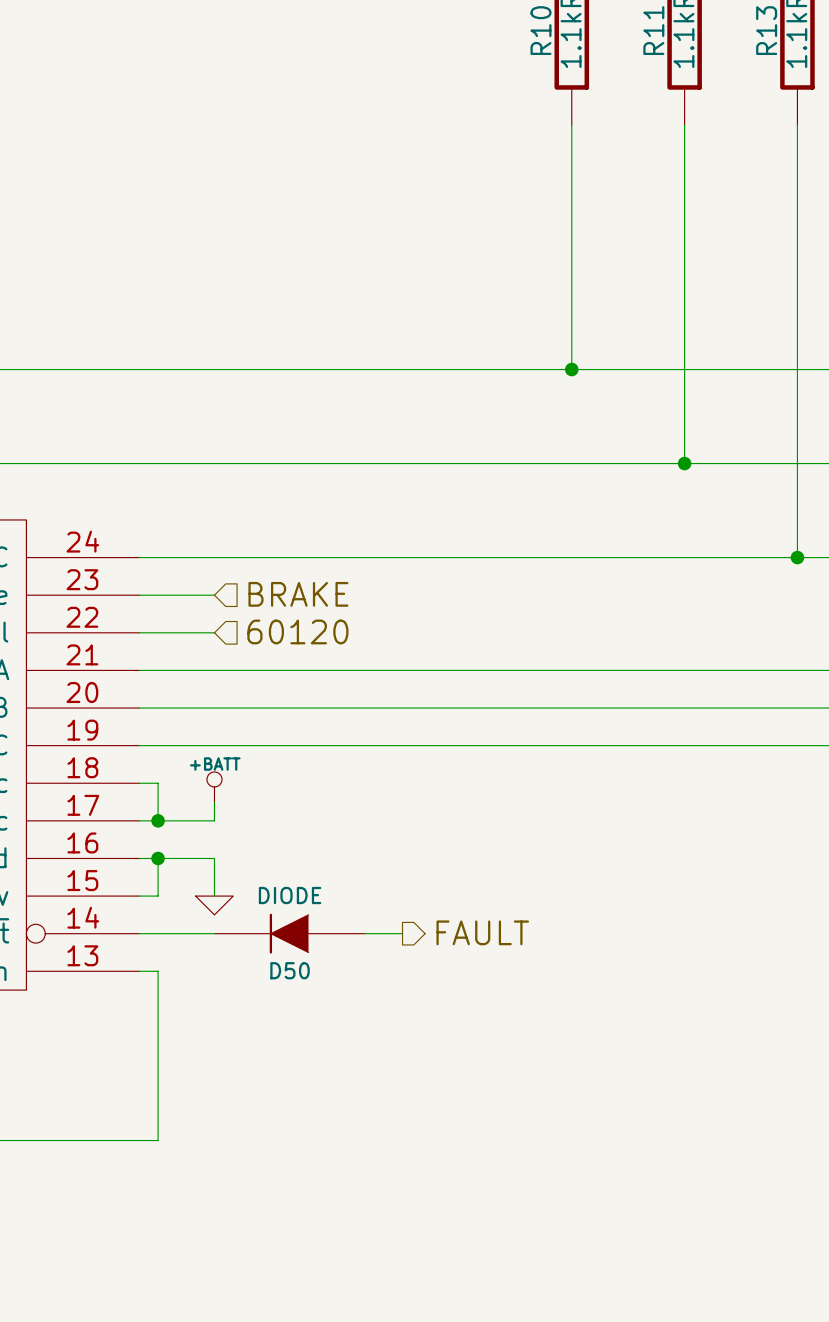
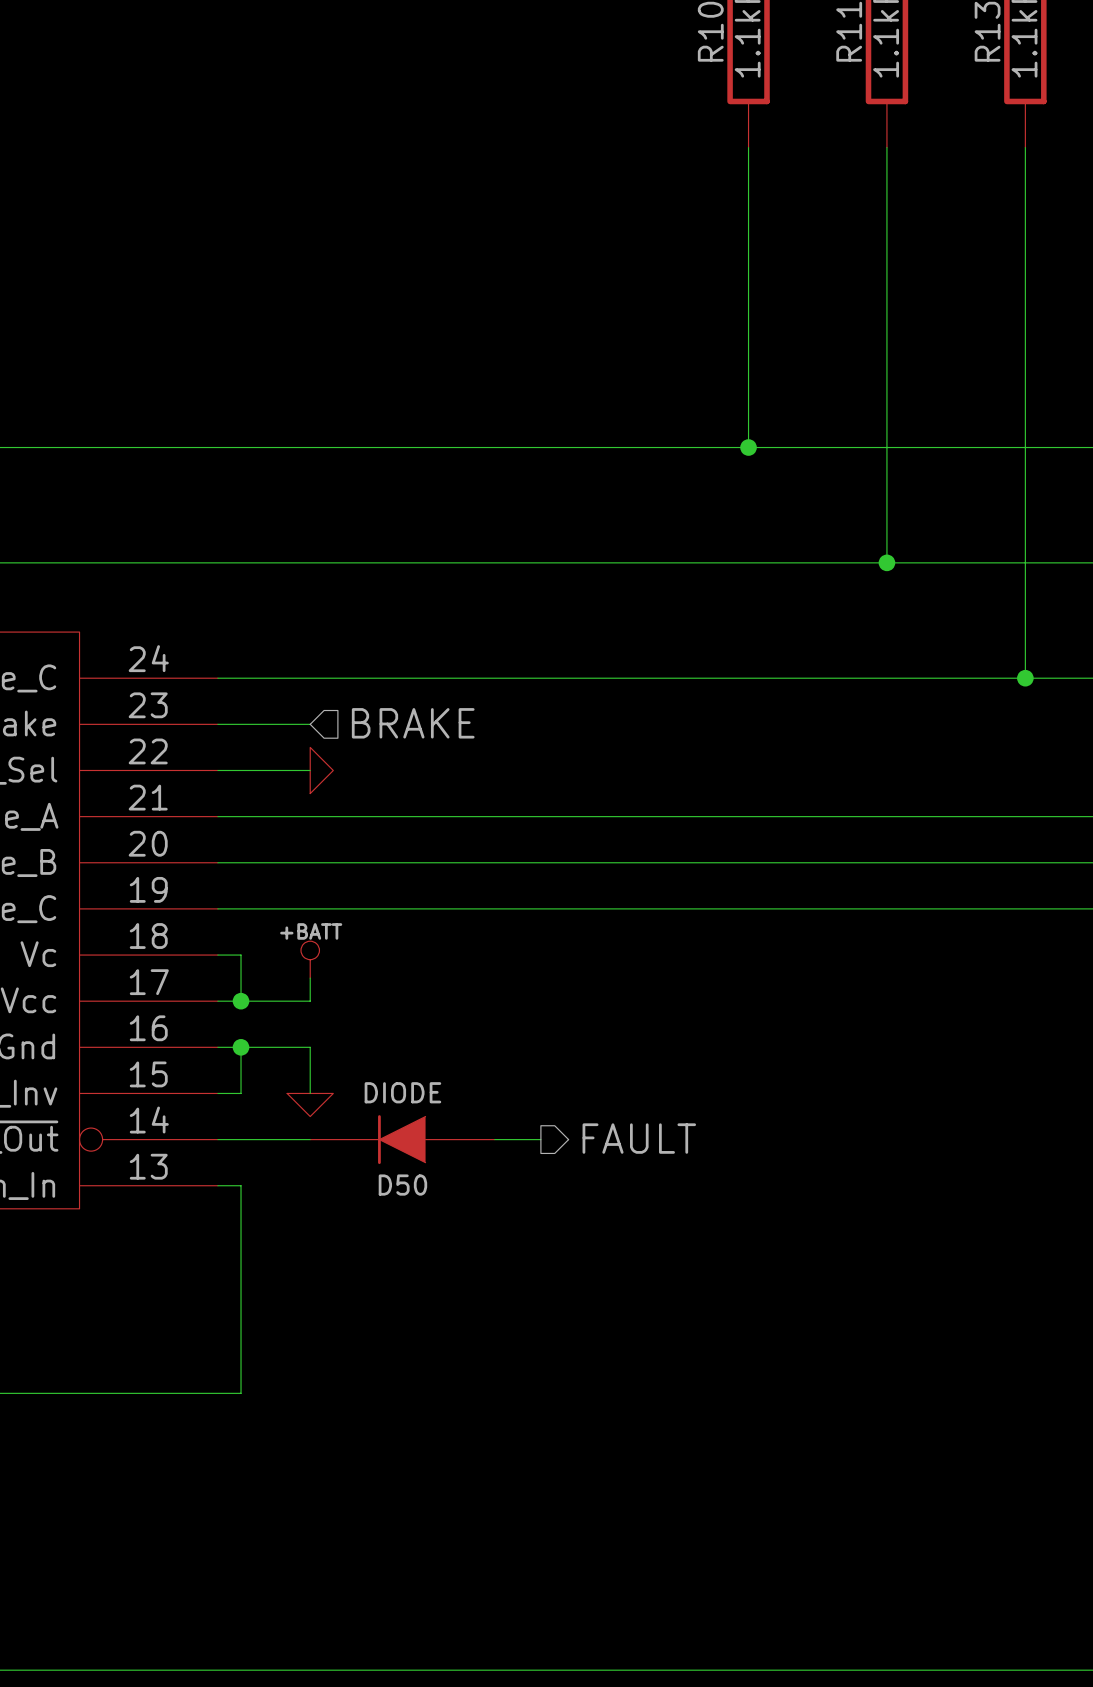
hierarchical label: 60120 (297, 631) -> none
power symbol: none -> (321, 770)

